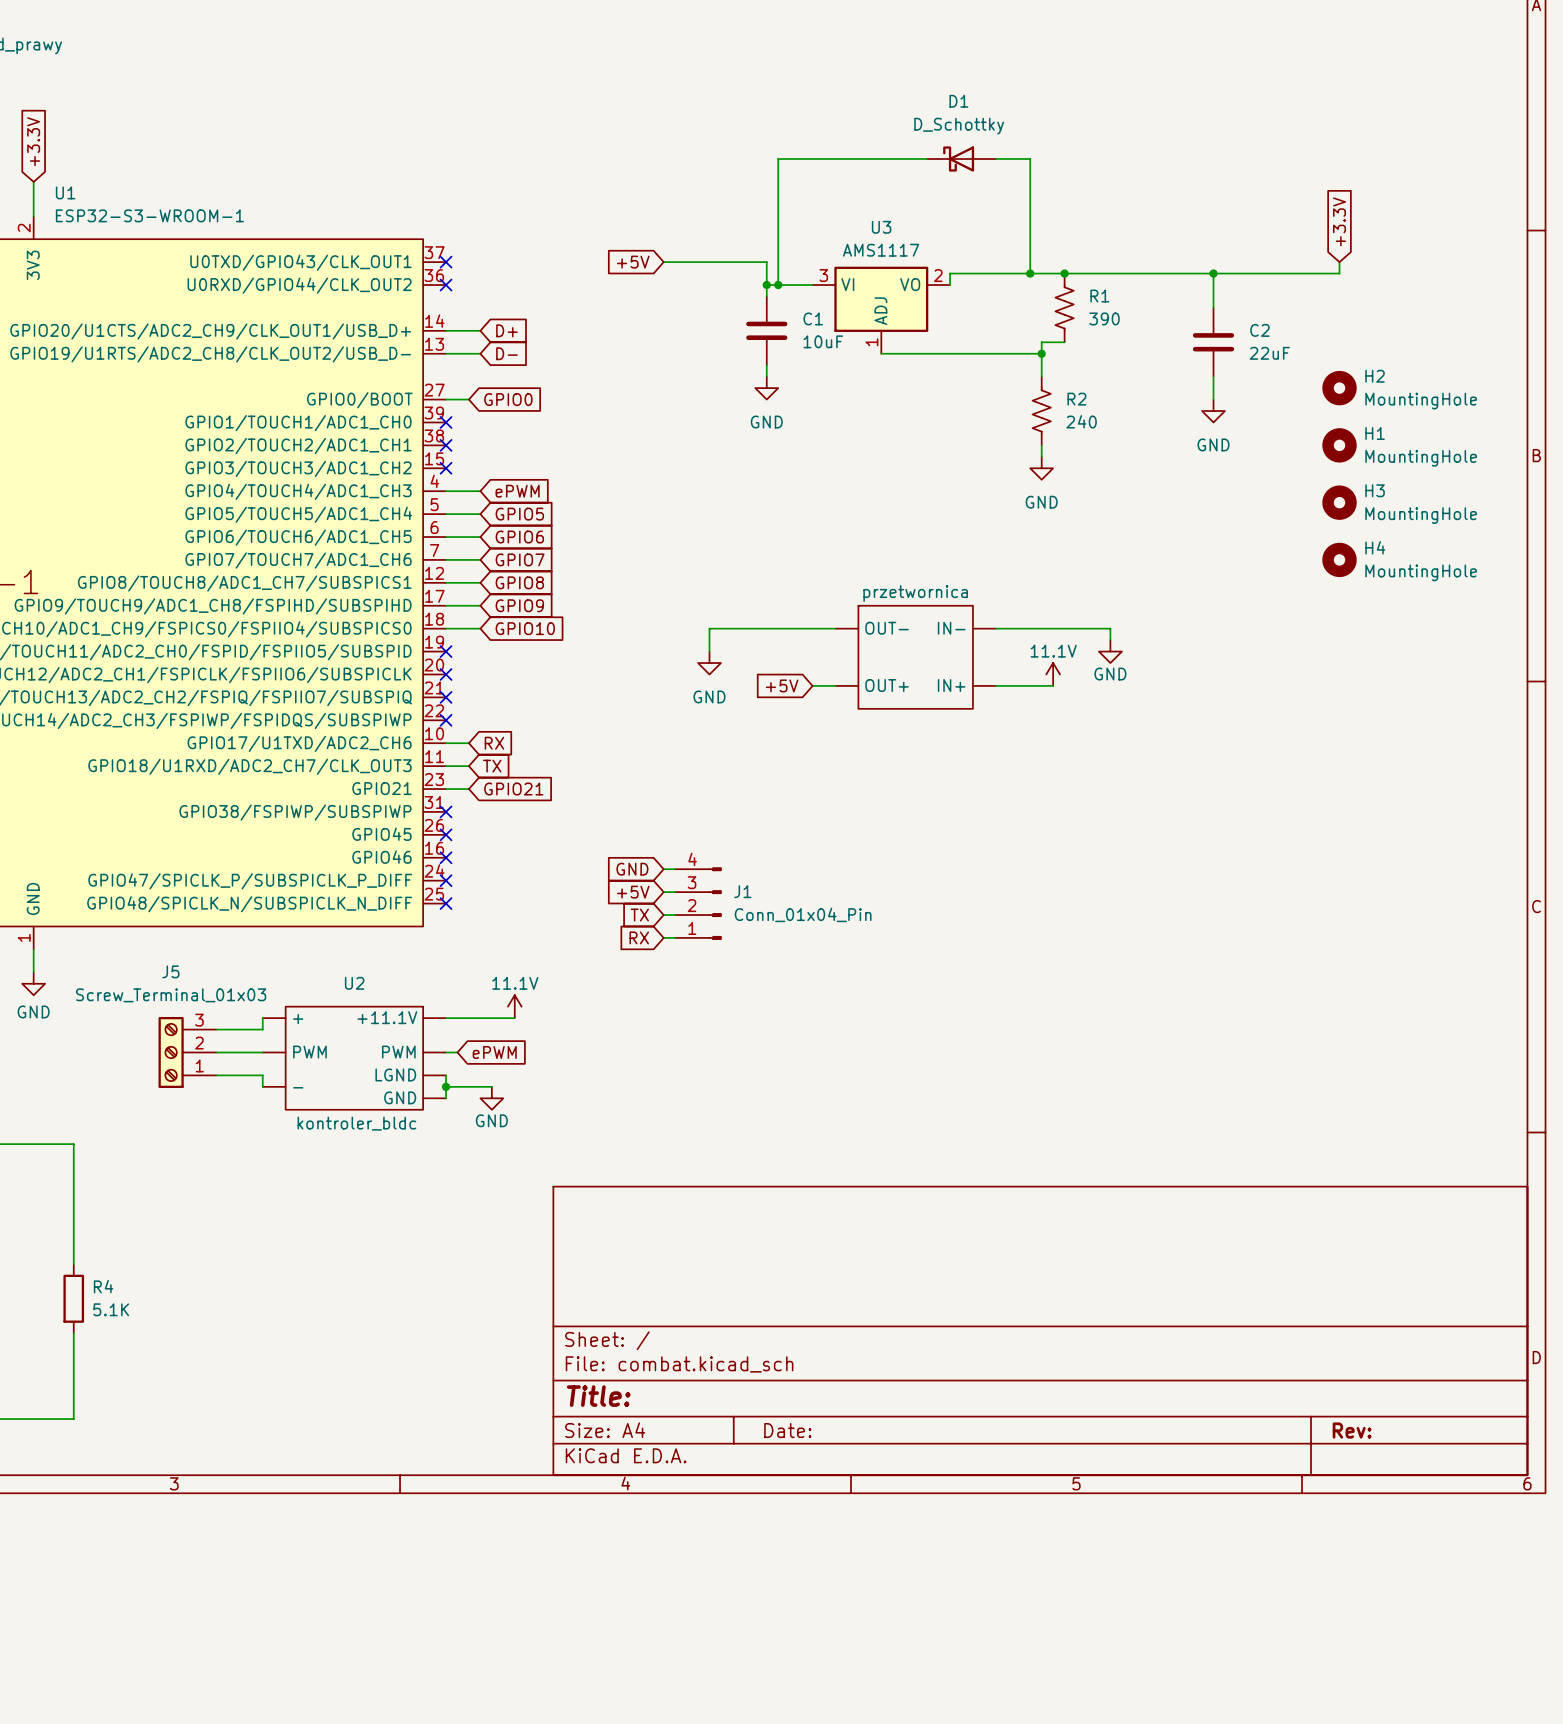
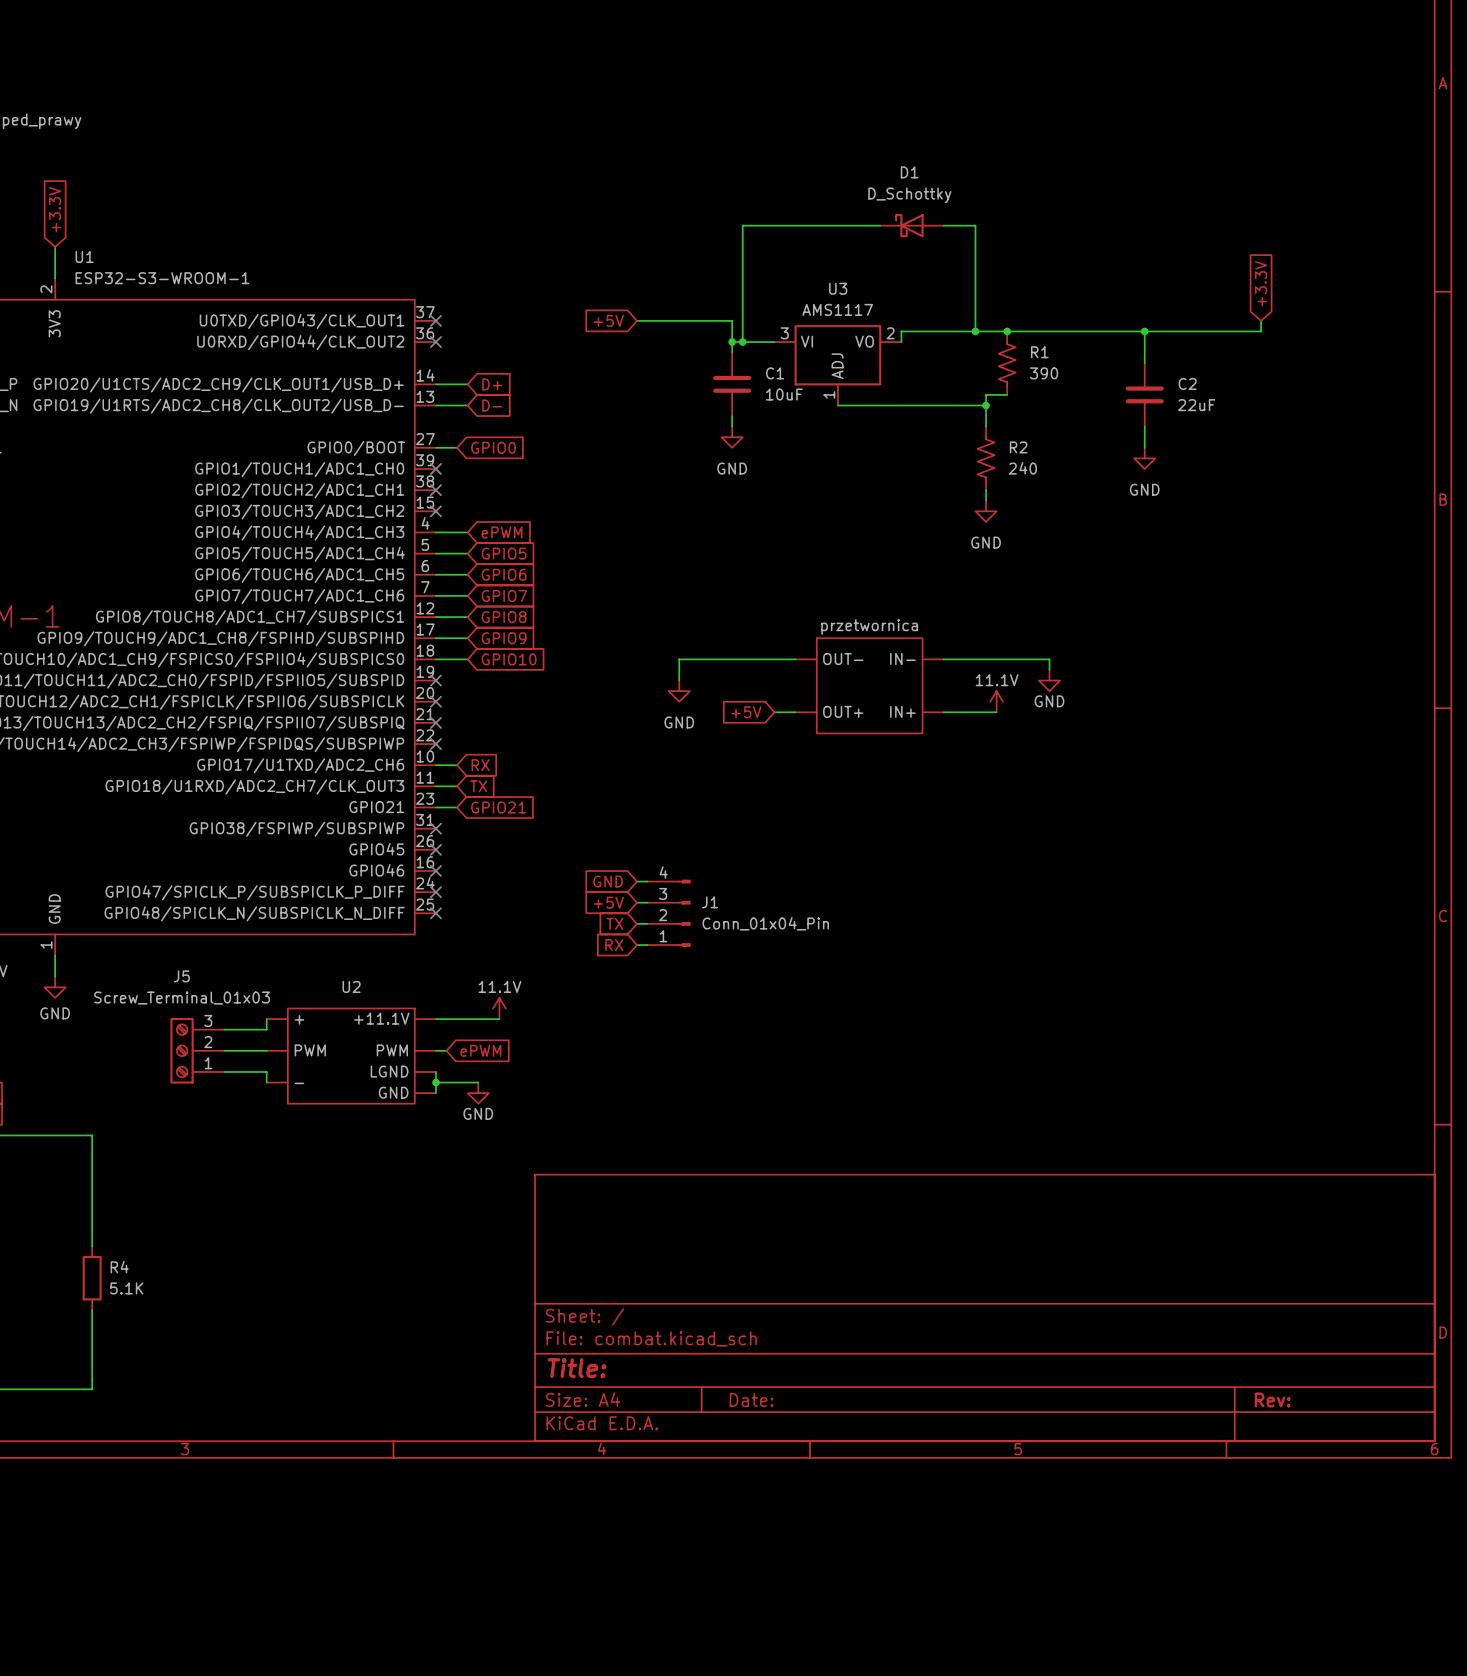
H2: MountingHole (1339, 388) -> none
H1: MountingHole (1339, 445) -> none
H3: MountingHole (1339, 502) -> none
H4: MountingHole (1339, 559) -> none
U2 value: kontroler_bldc (356, 1123) -> none

